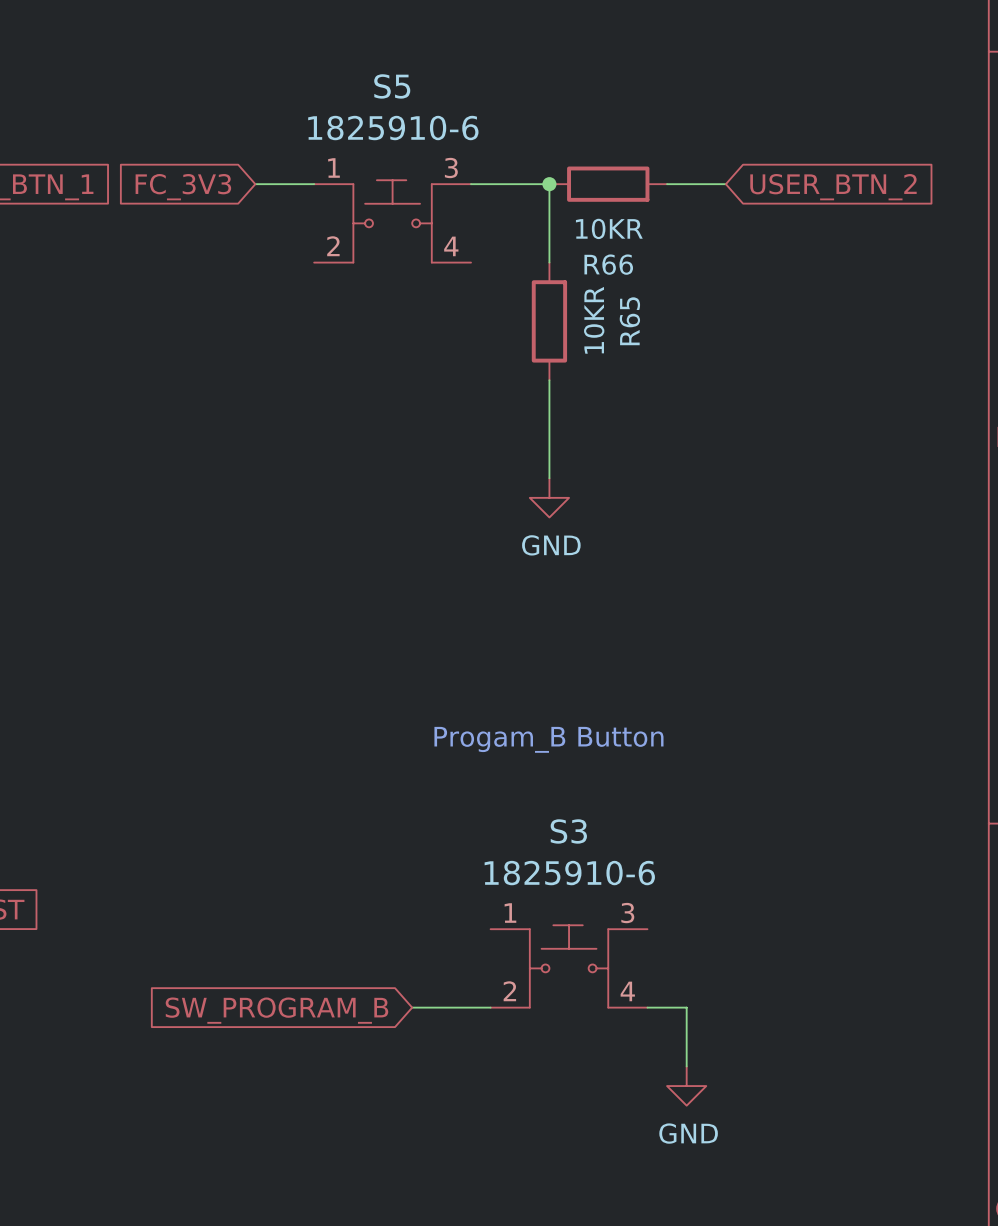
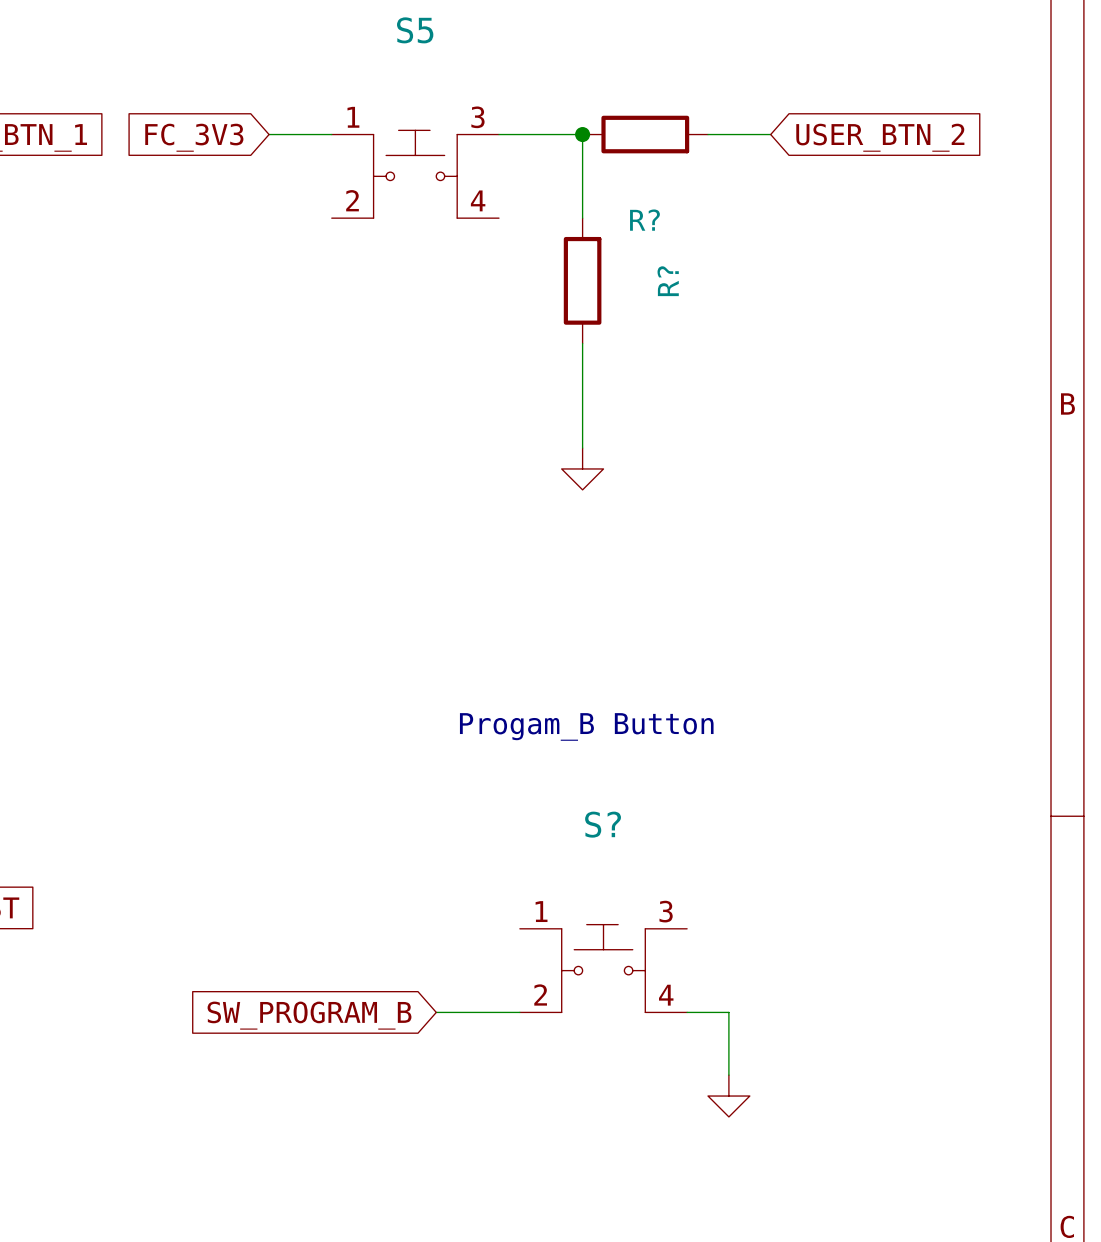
S5 value: 1825910-6 (393, 128) -> none
R66 value: 10KR (609, 228) -> none
R66 name: R66 (608, 264) -> R? (644, 220)
R65 value: 10KR (594, 320) -> none
R65 name: R65 (629, 321) -> R? (668, 281)
power symbol text: GND (551, 545) -> none
S3 name: S3 (568, 831) -> S? (603, 824)
S3 value: 1825910-6 (569, 873) -> none
power symbol text: GND (688, 1133) -> none

